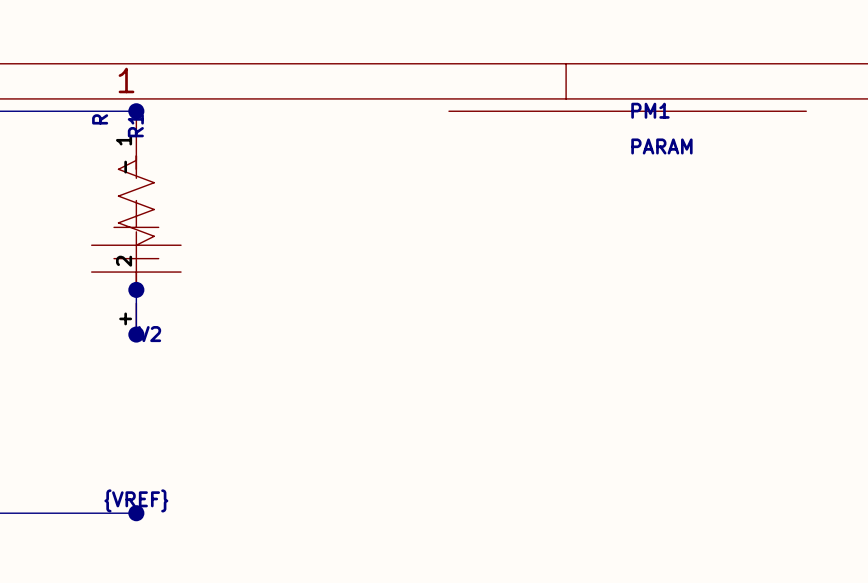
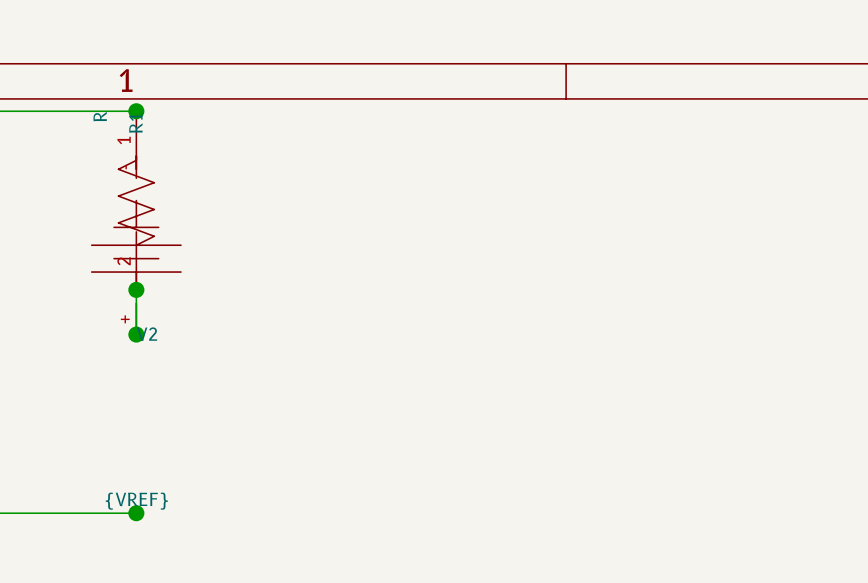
PM1: PARAM (627, 111) -> none

